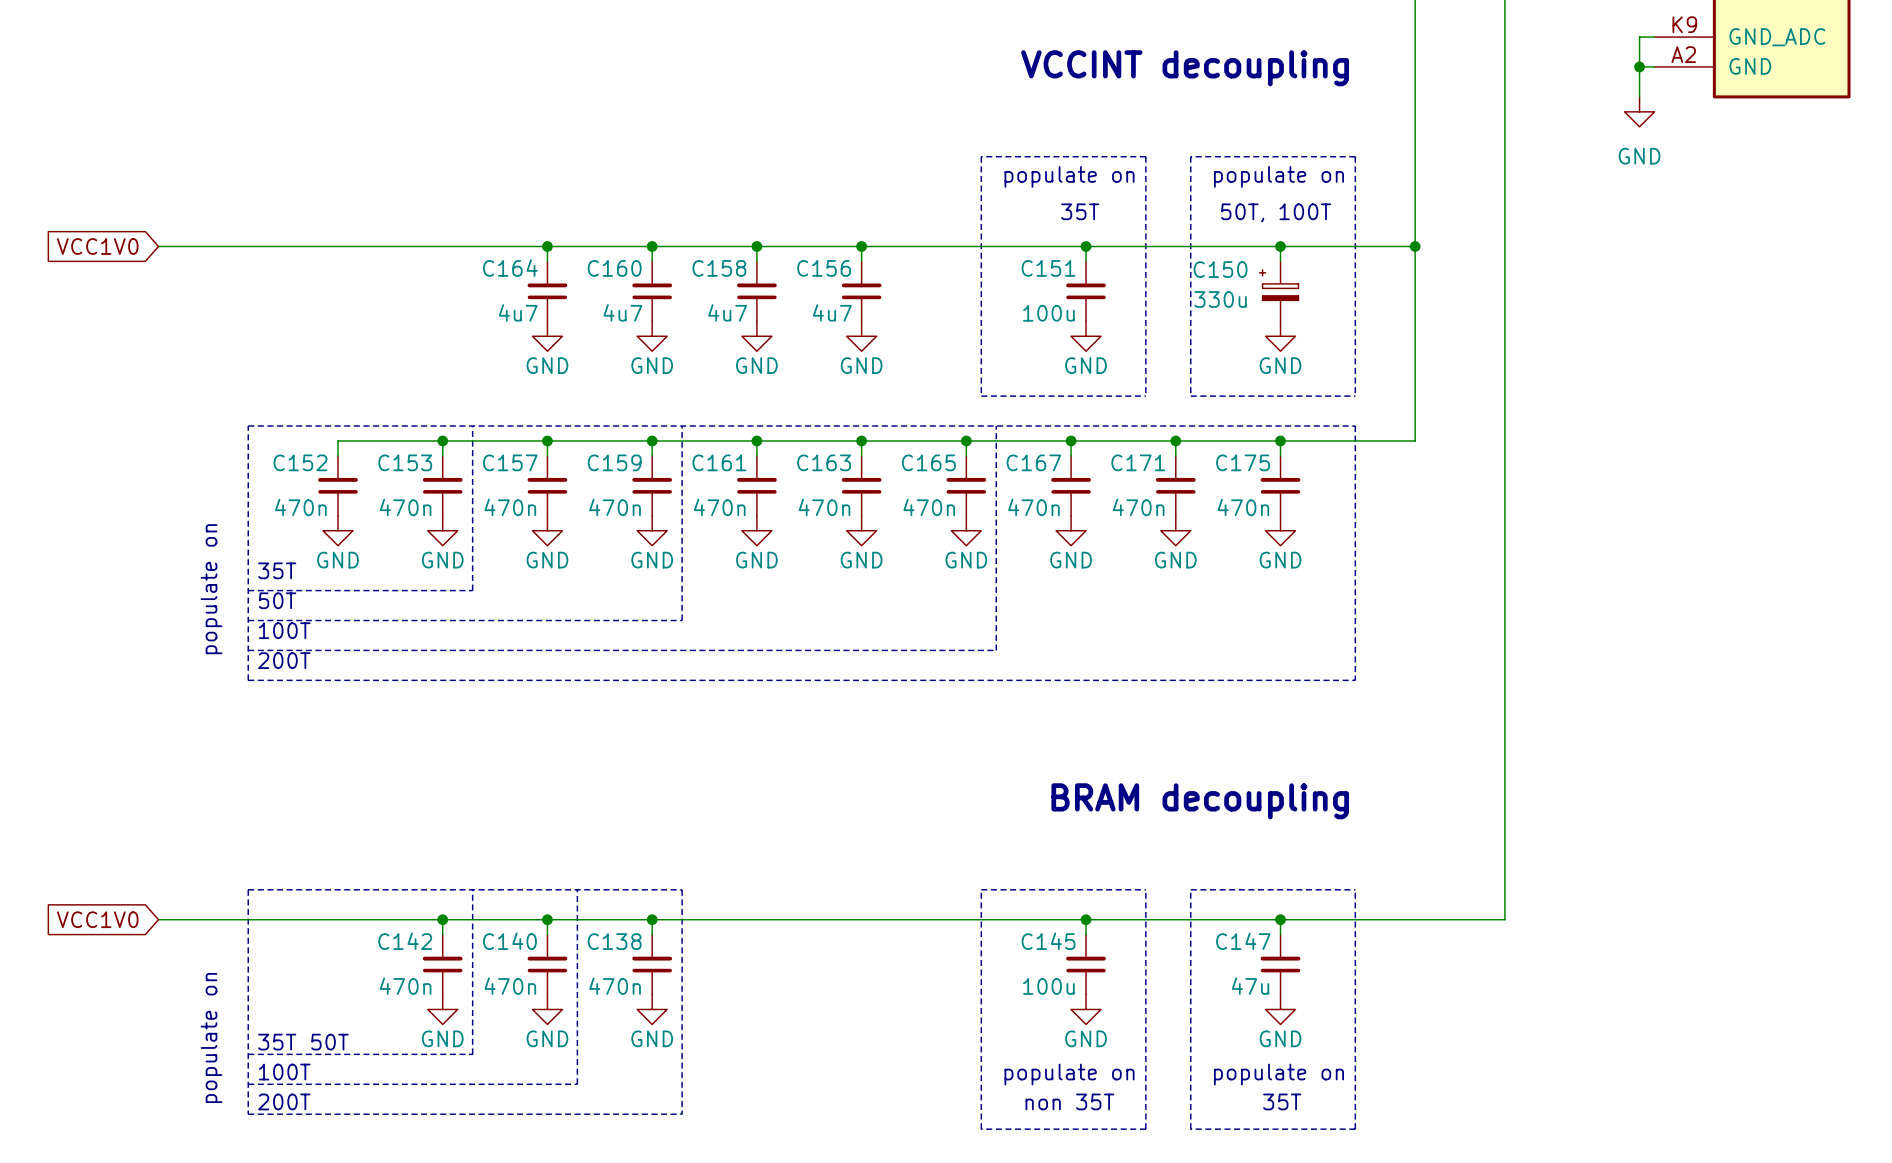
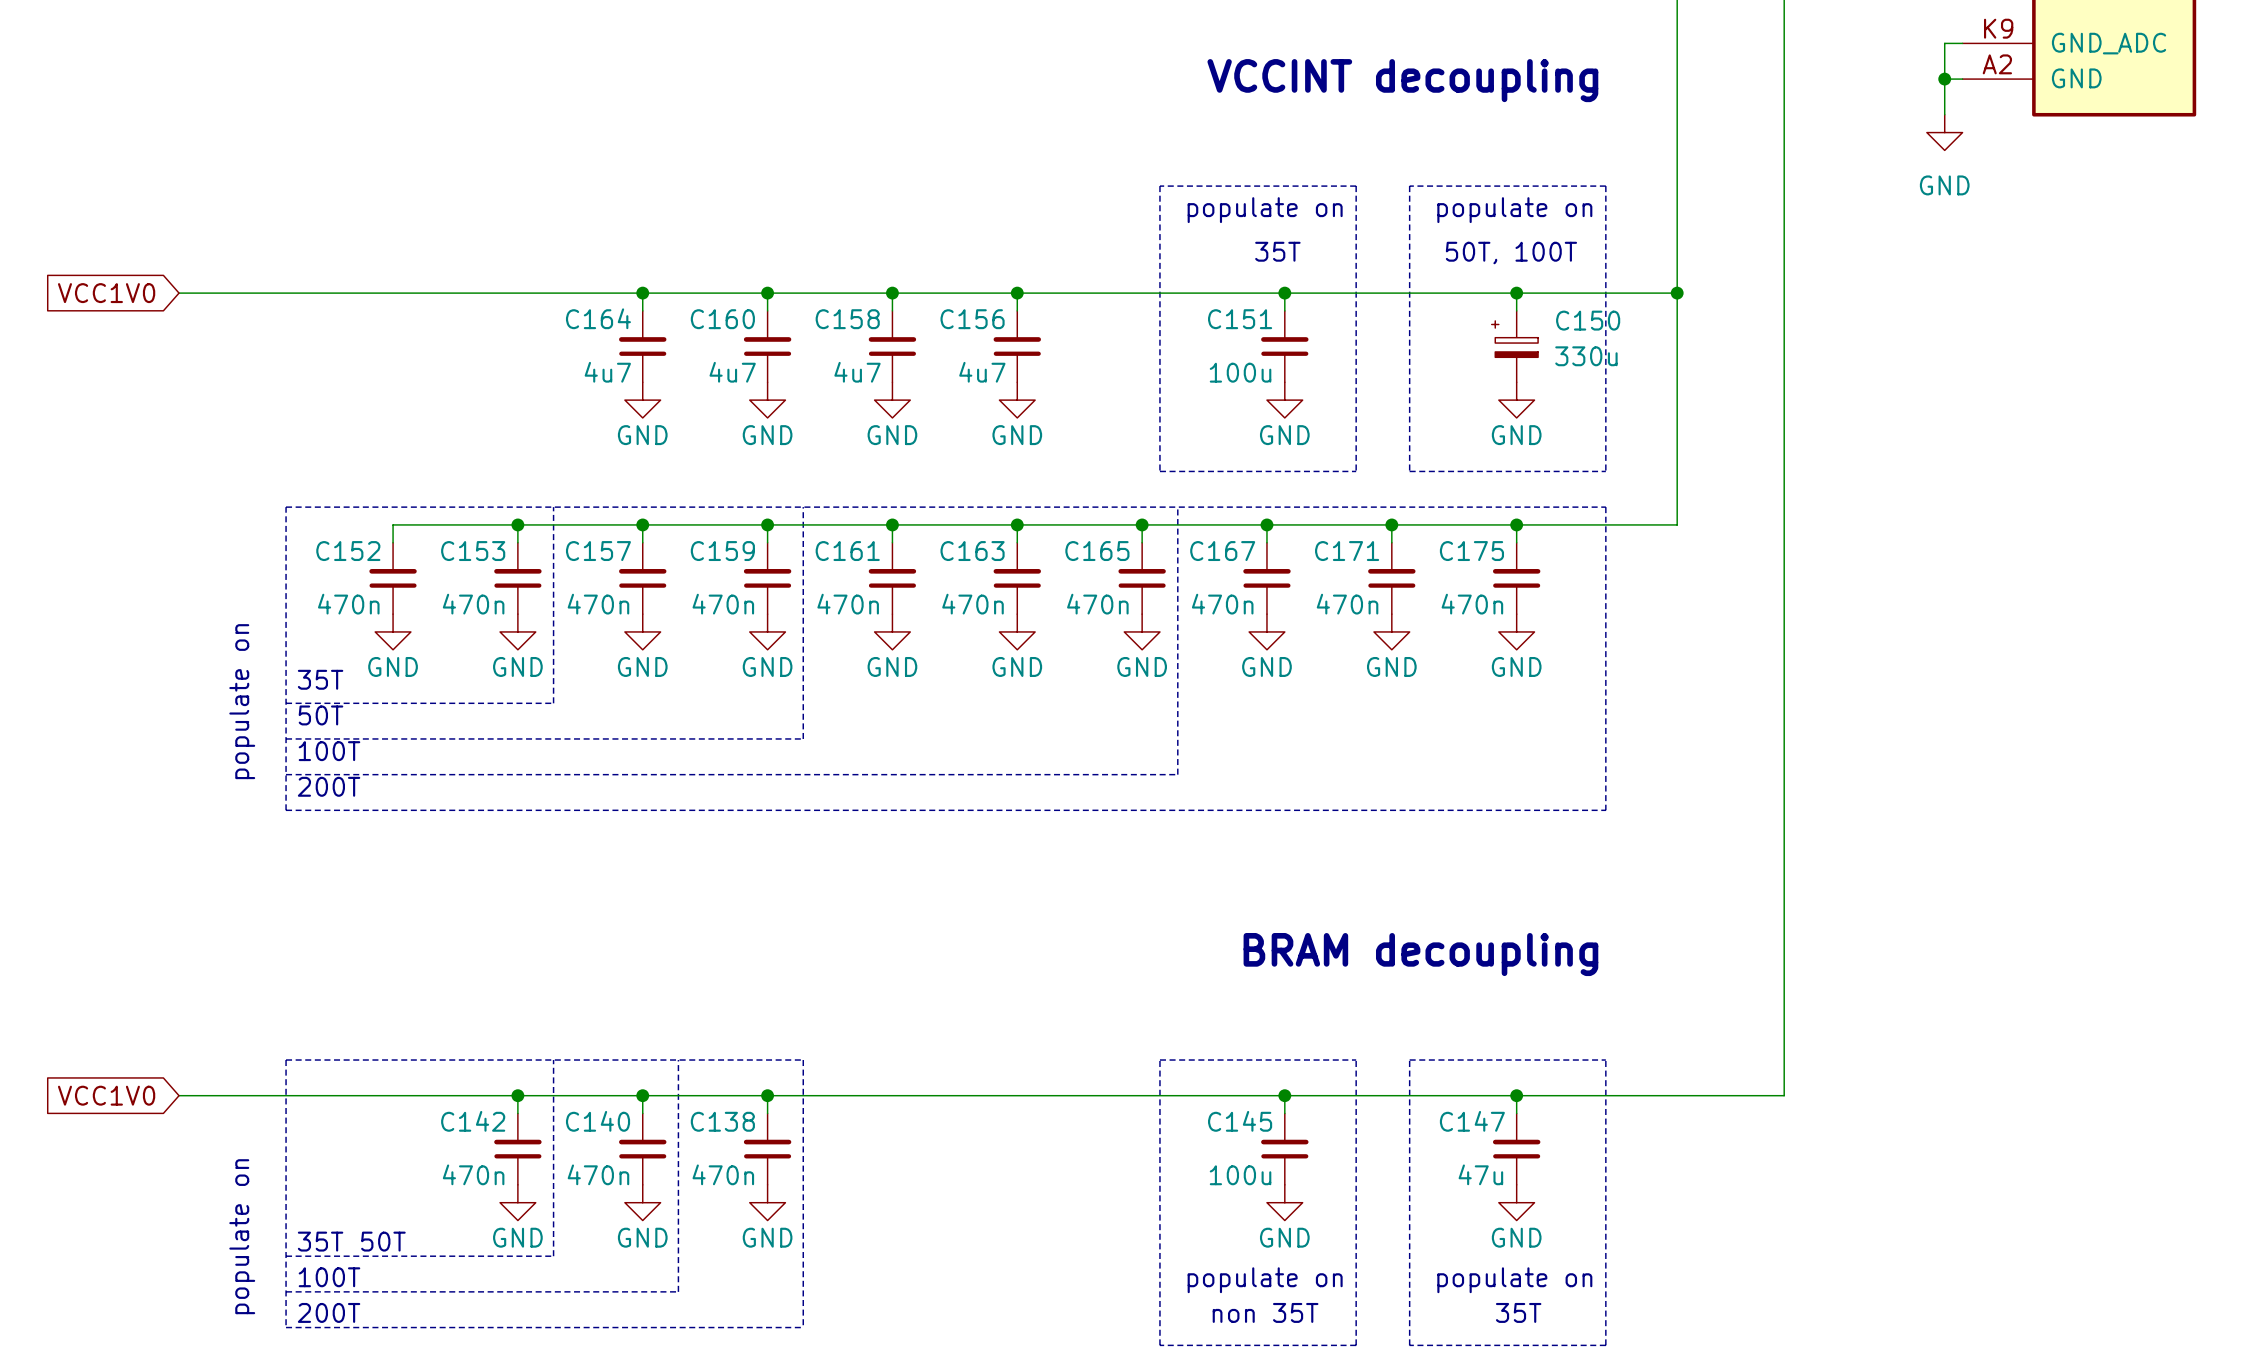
C150 name position: C150 (1220, 269) -> C150 (1588, 320)
C150 text position: 330u (1220, 299) -> 330u (1586, 356)

